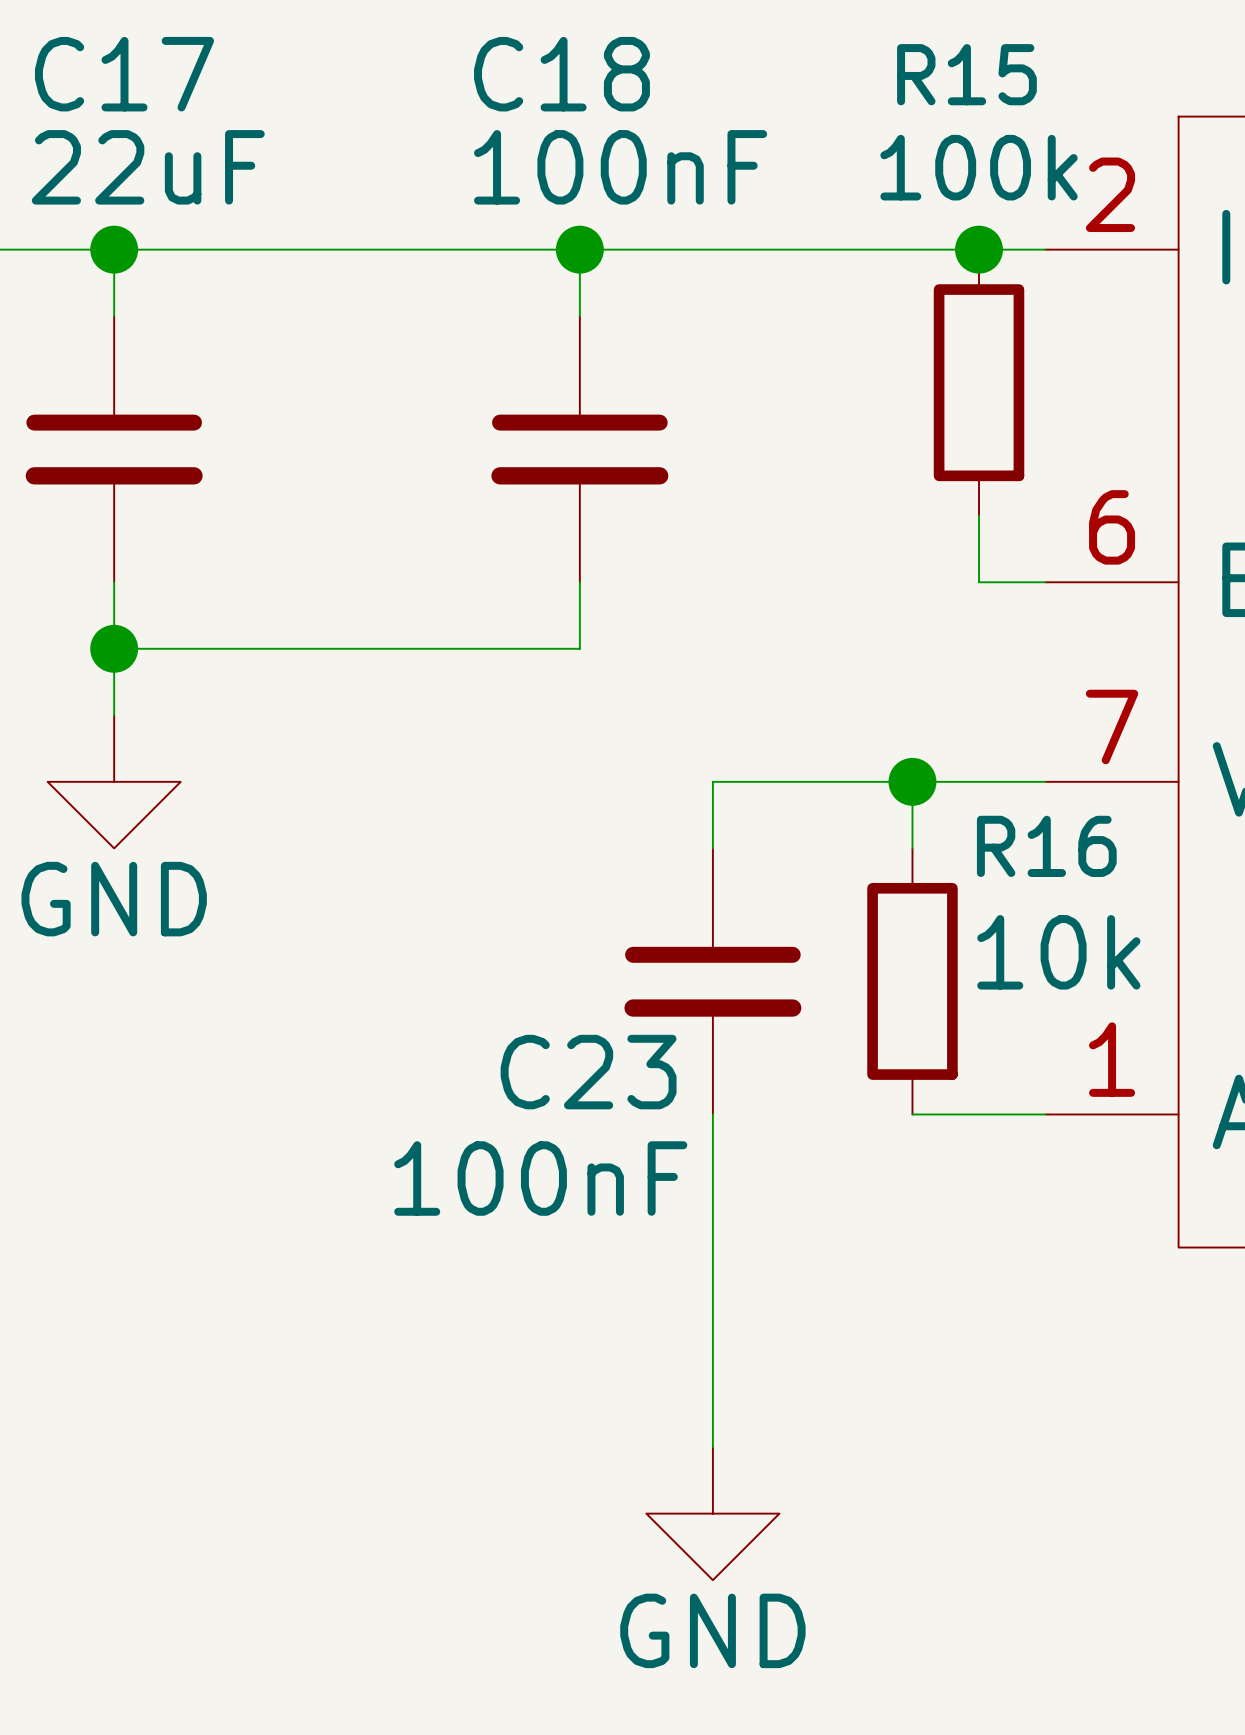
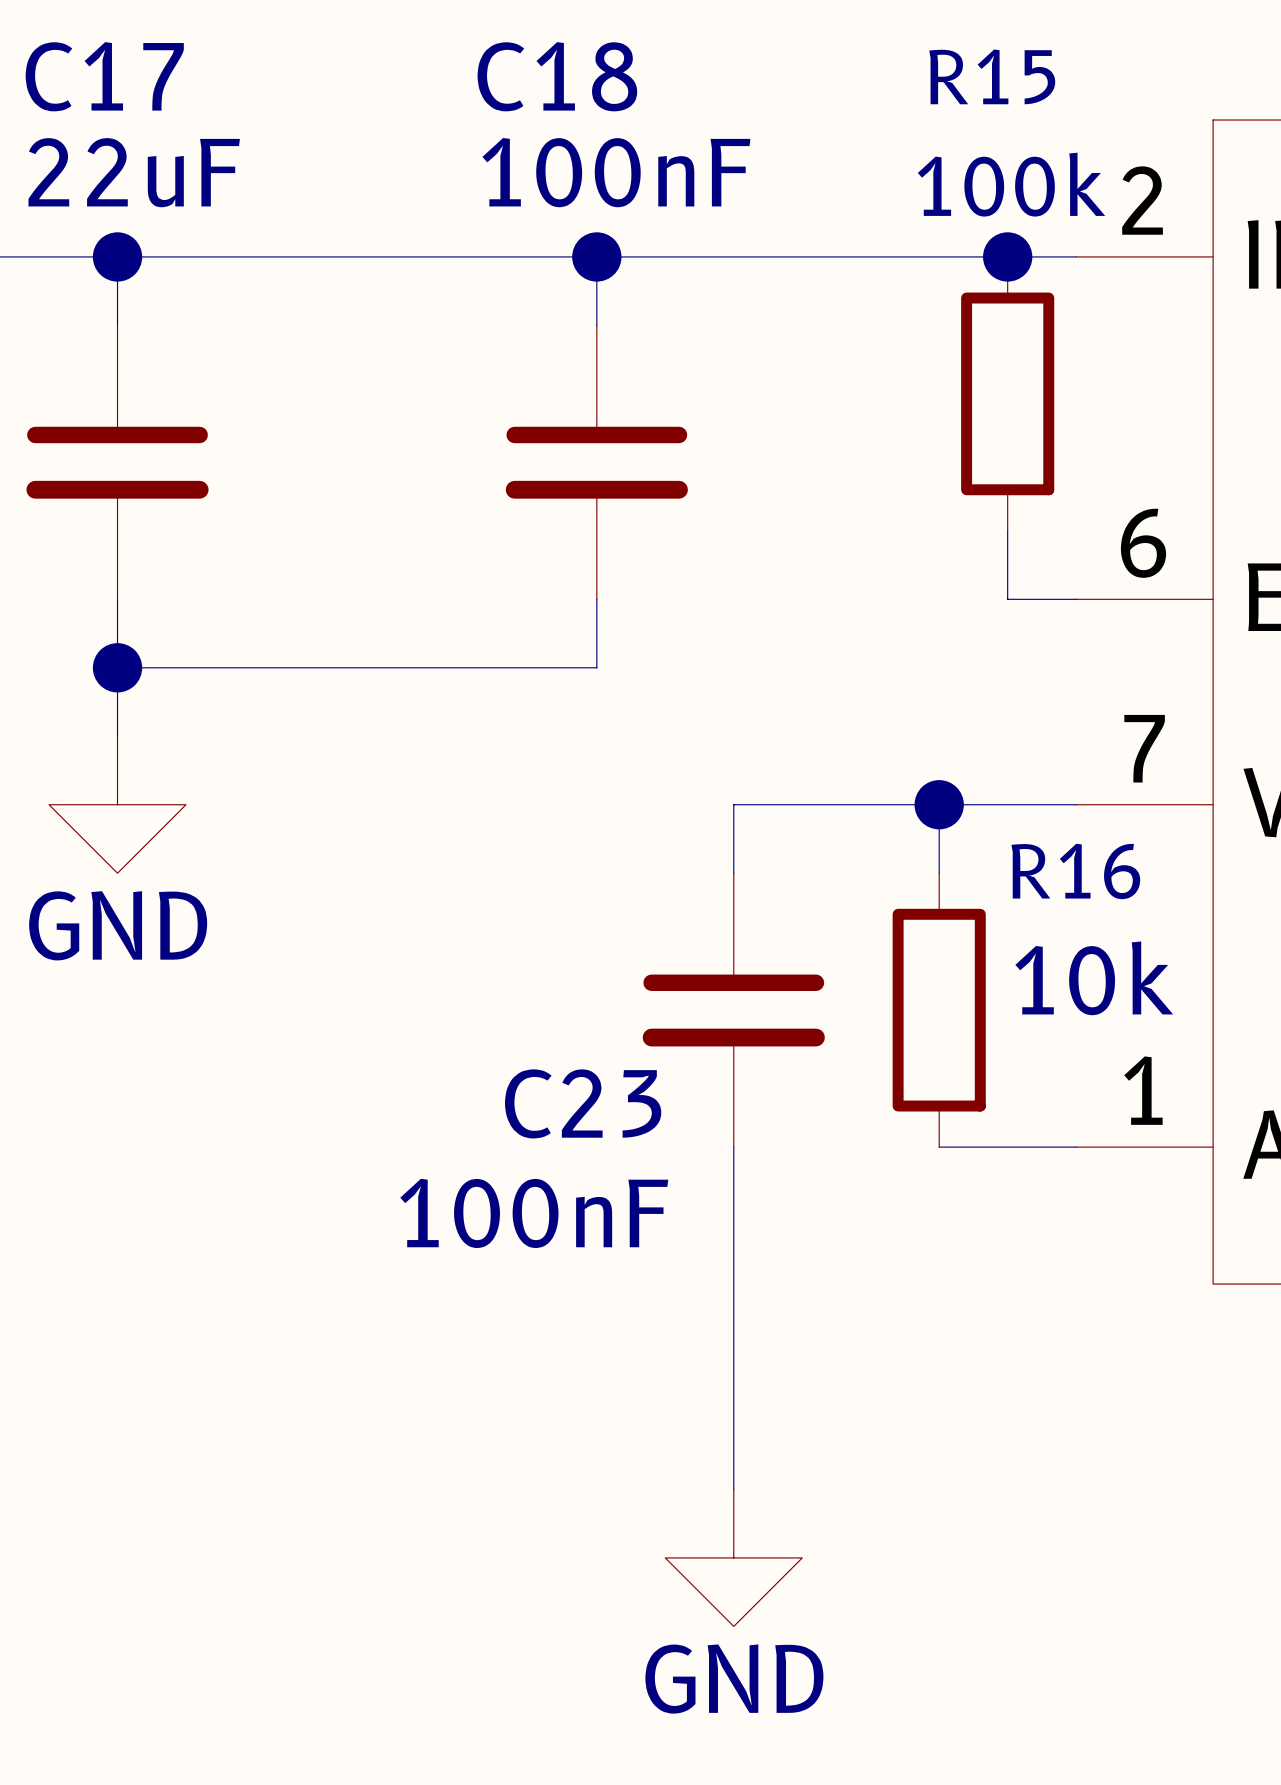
R15 value position: 100k (979, 167) -> 100k (1011, 184)

